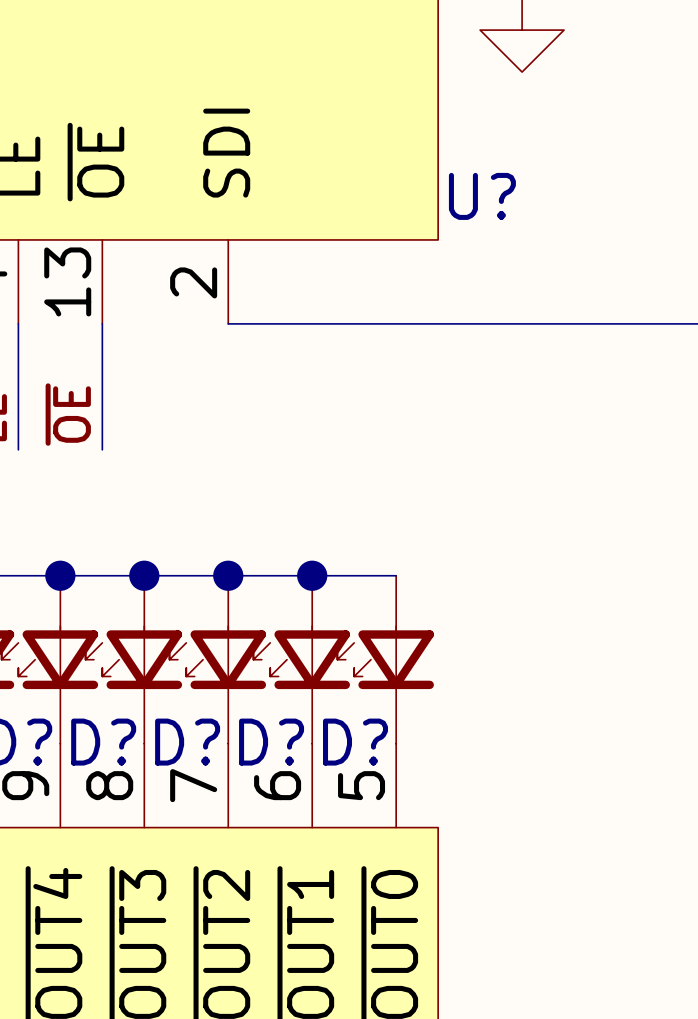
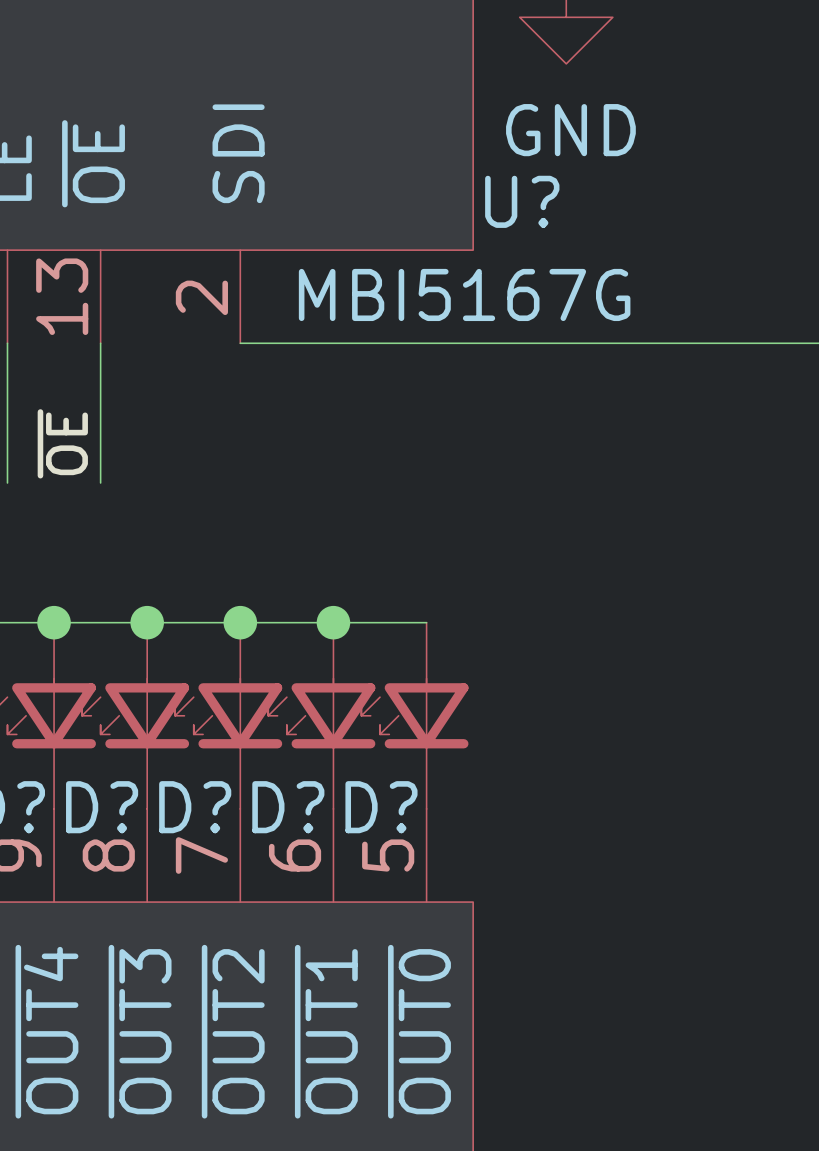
power symbol text: none -> GND (570, 130)
U? value: none -> MBI5167G (464, 294)

